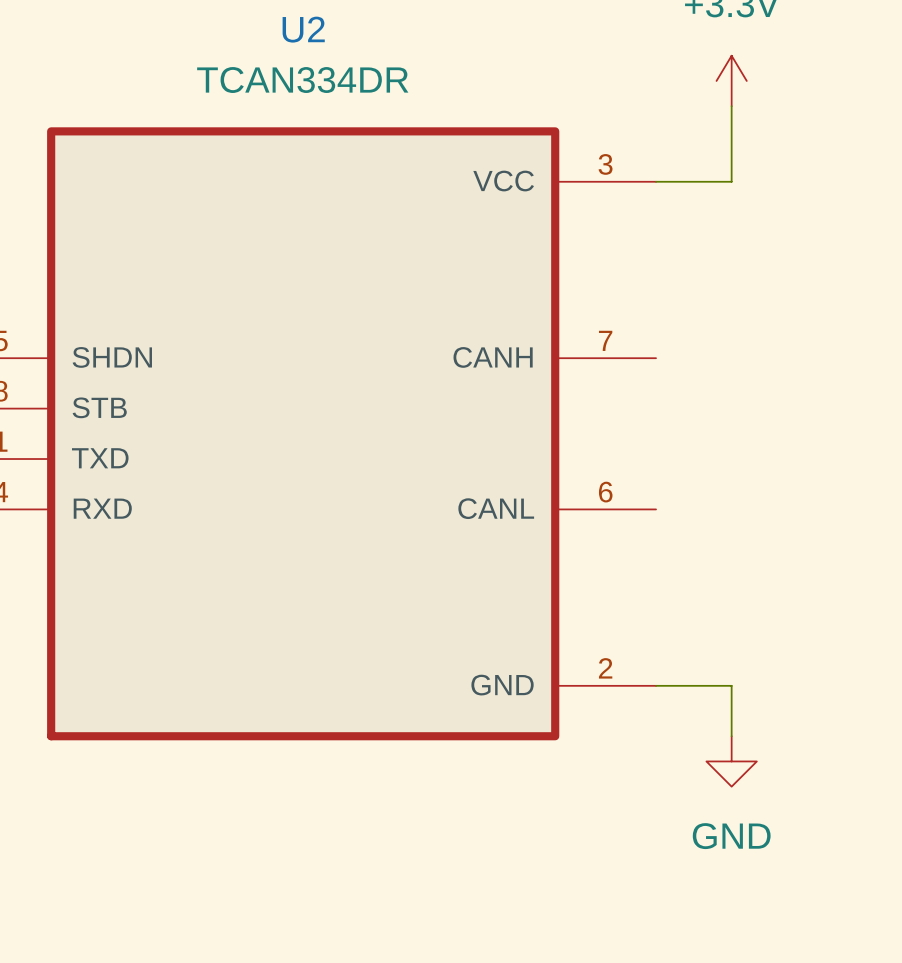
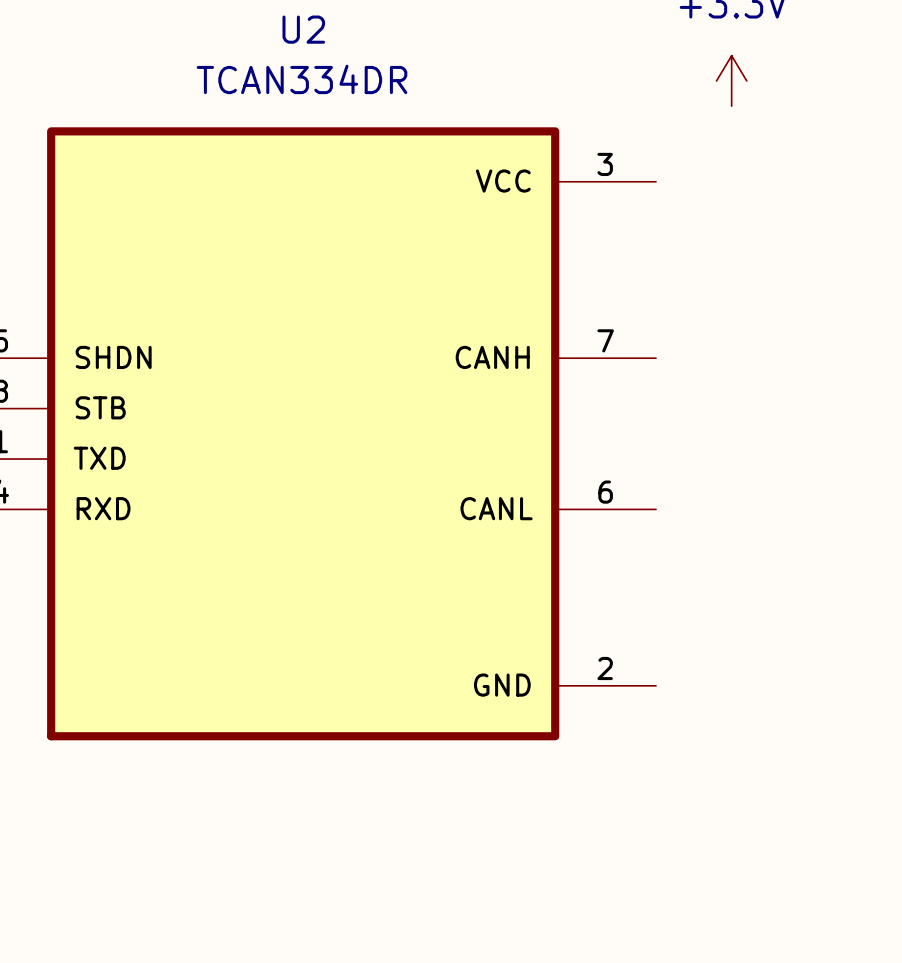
wire: (731, 106) (731, 181) (656, 181) -> none
wire: (656, 685) (731, 685) (731, 736) -> none
power symbol: GND (731, 761) -> none

